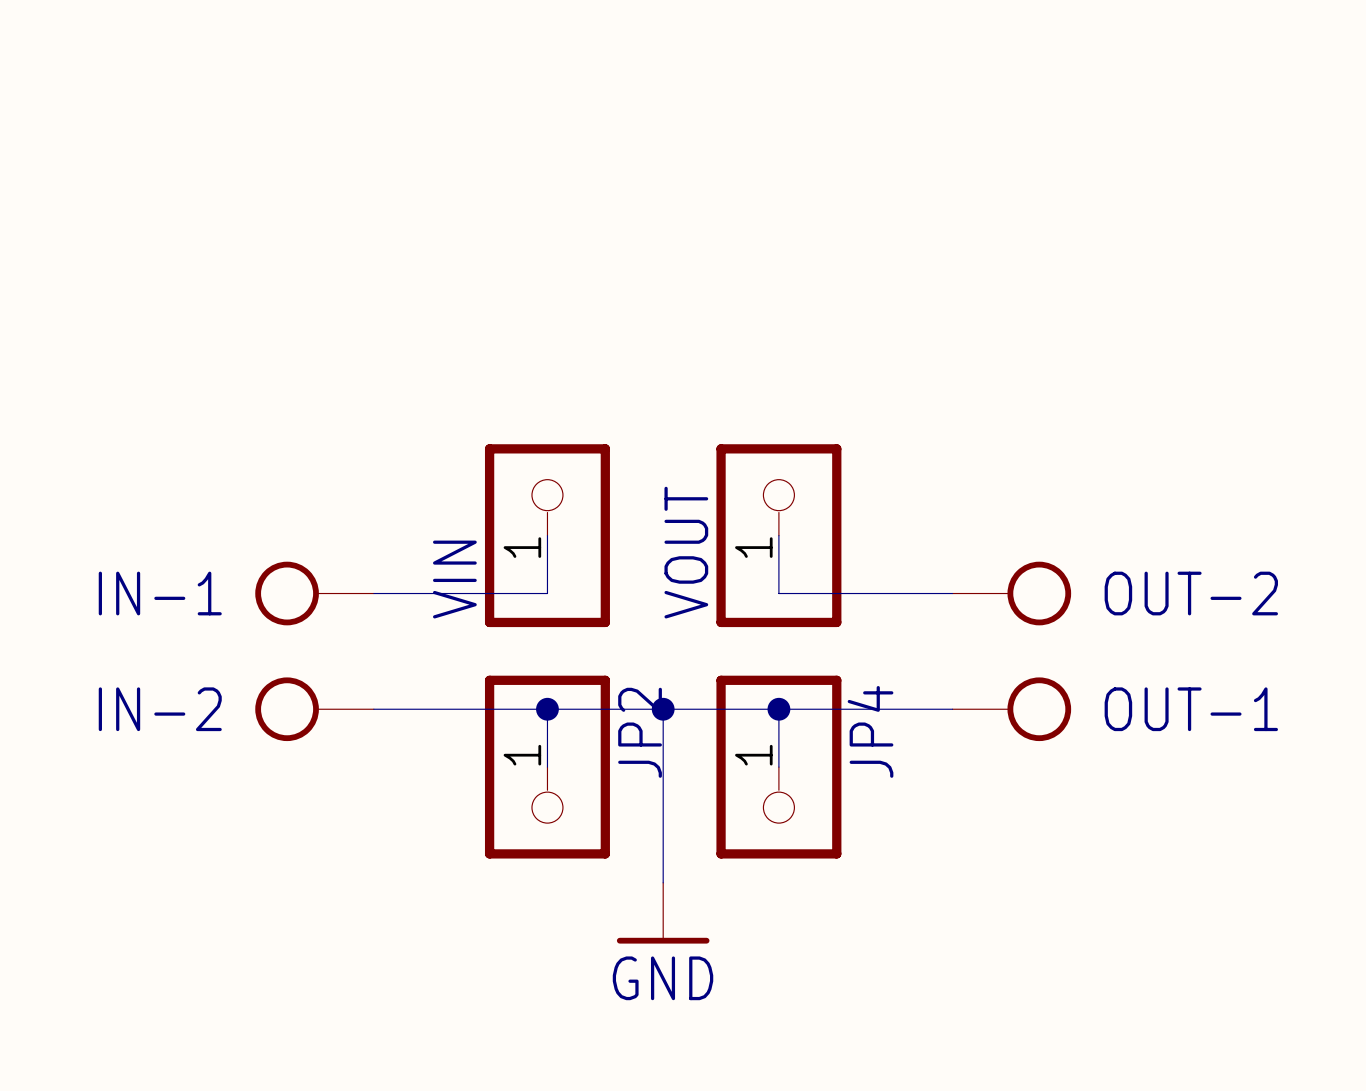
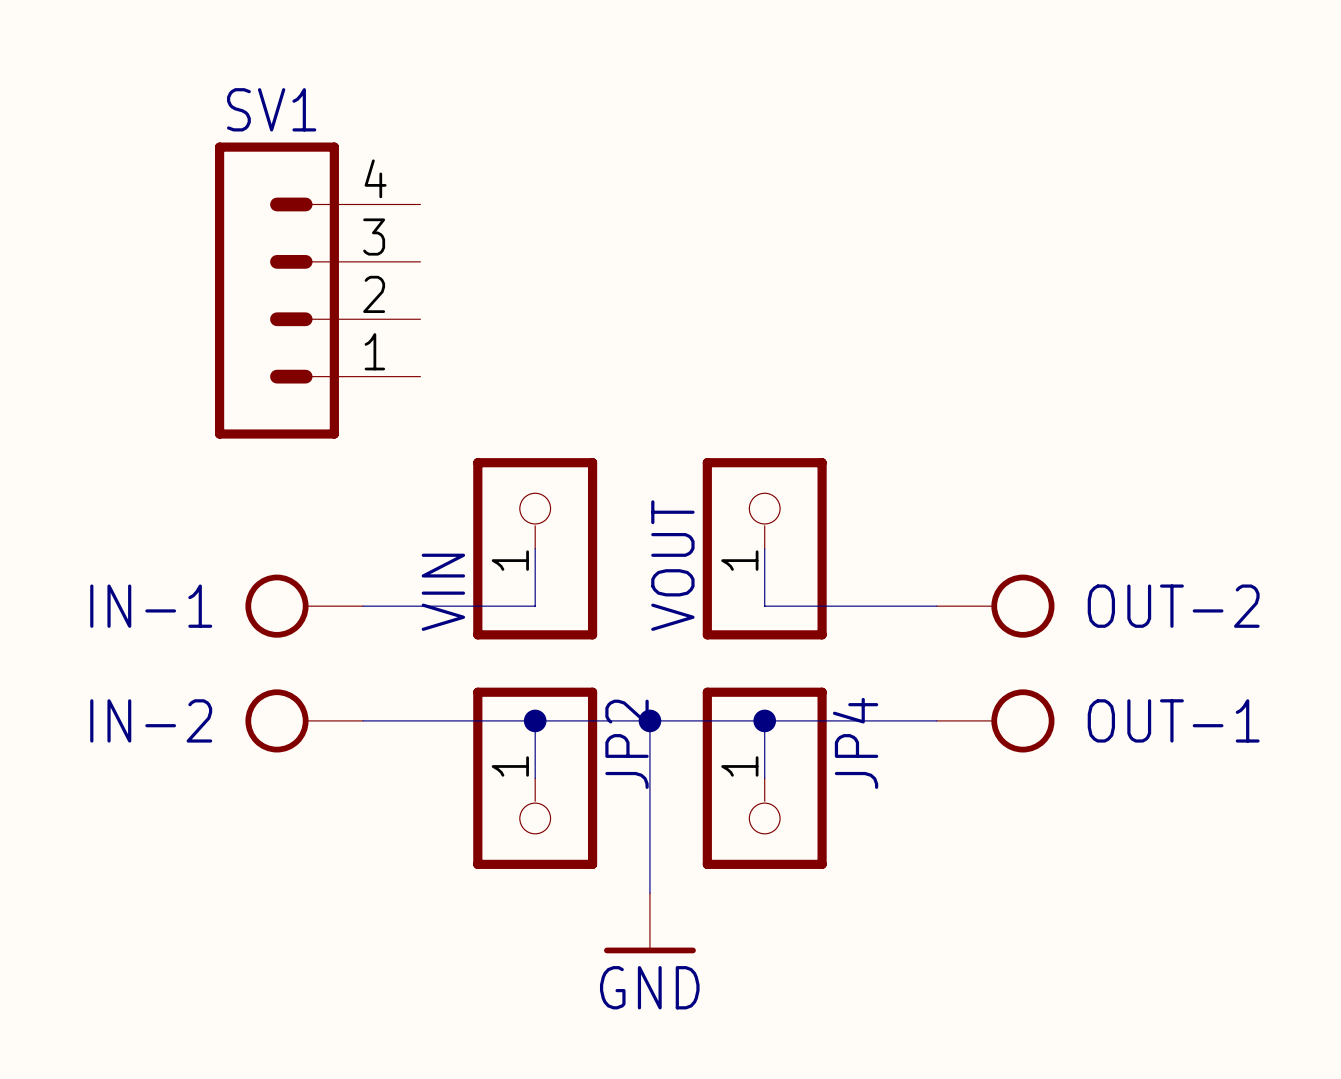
SV1: none -> (317, 290)

